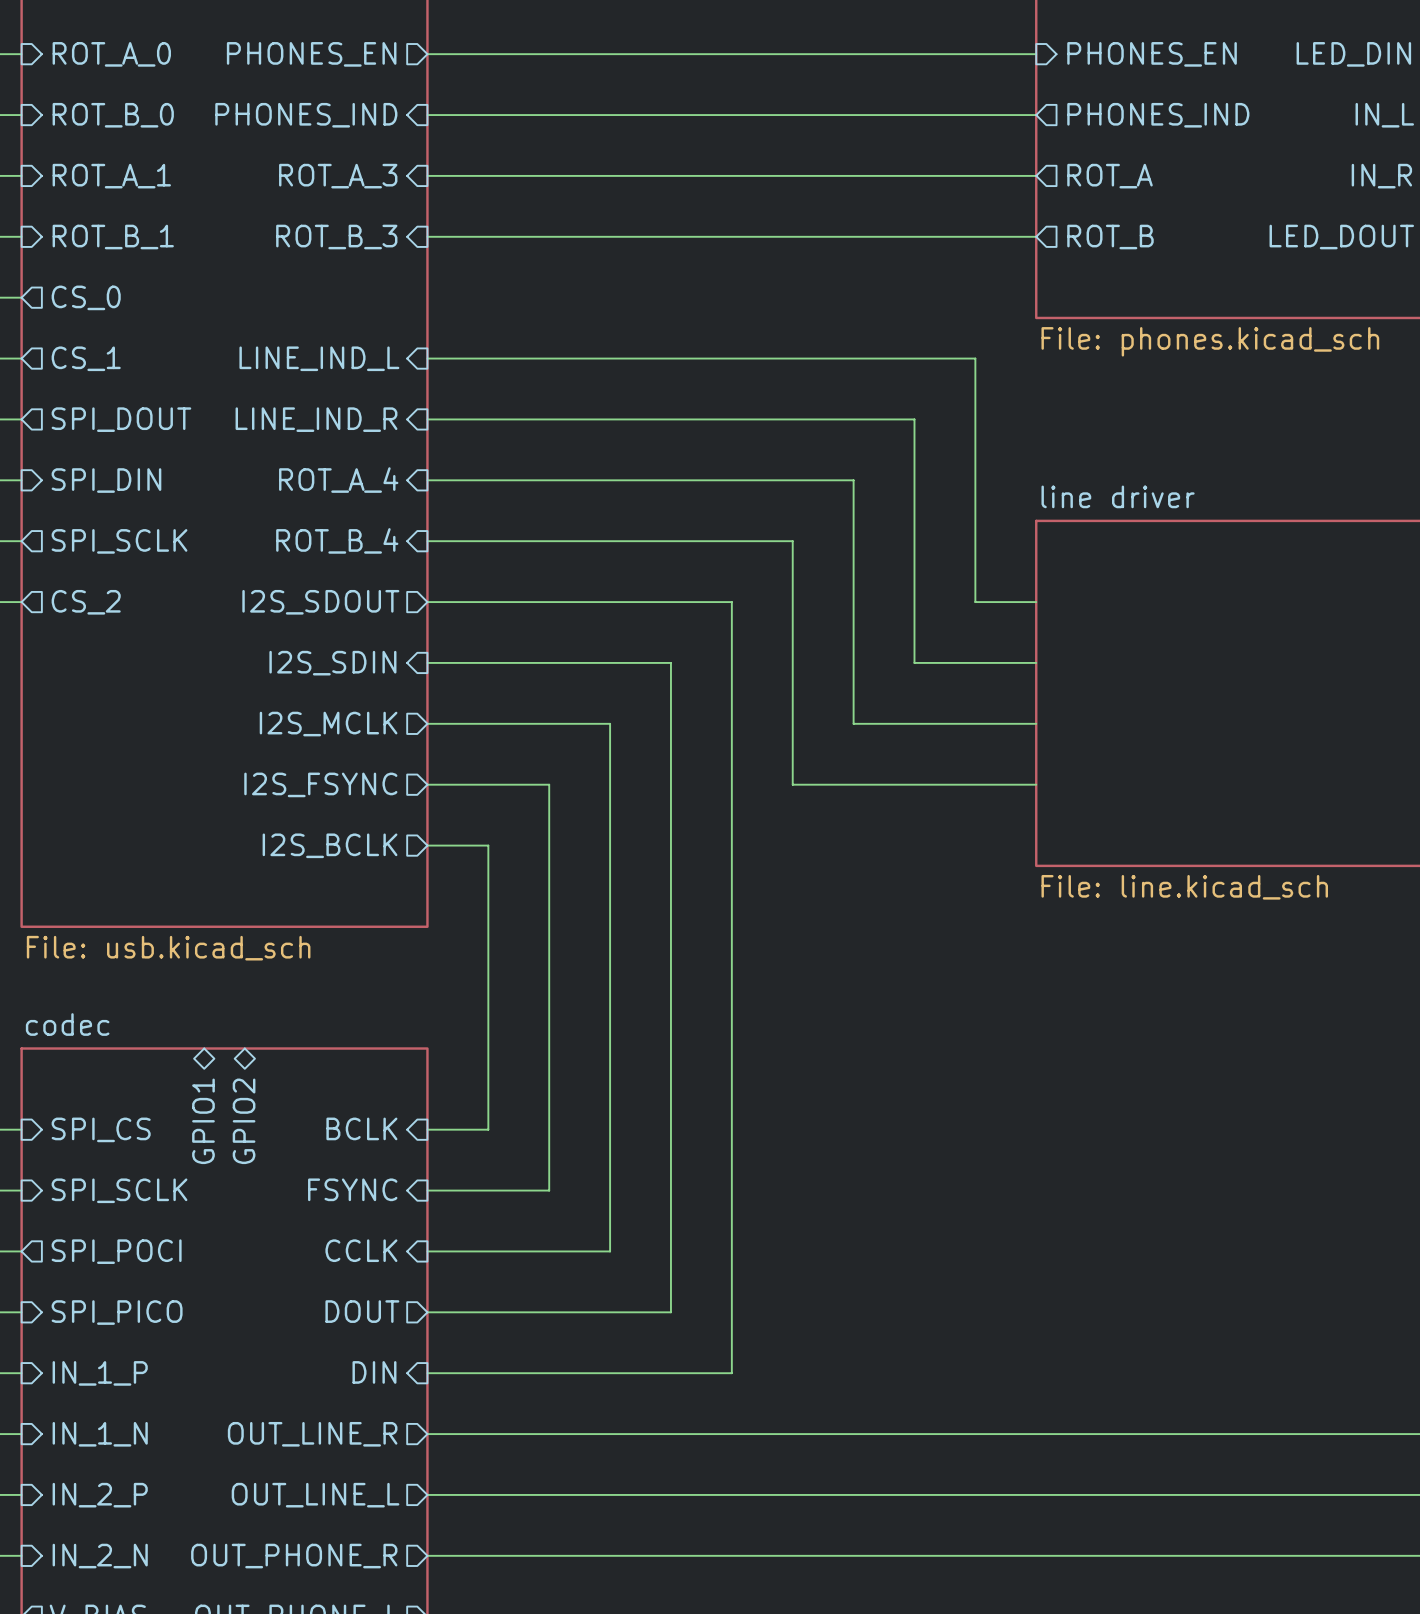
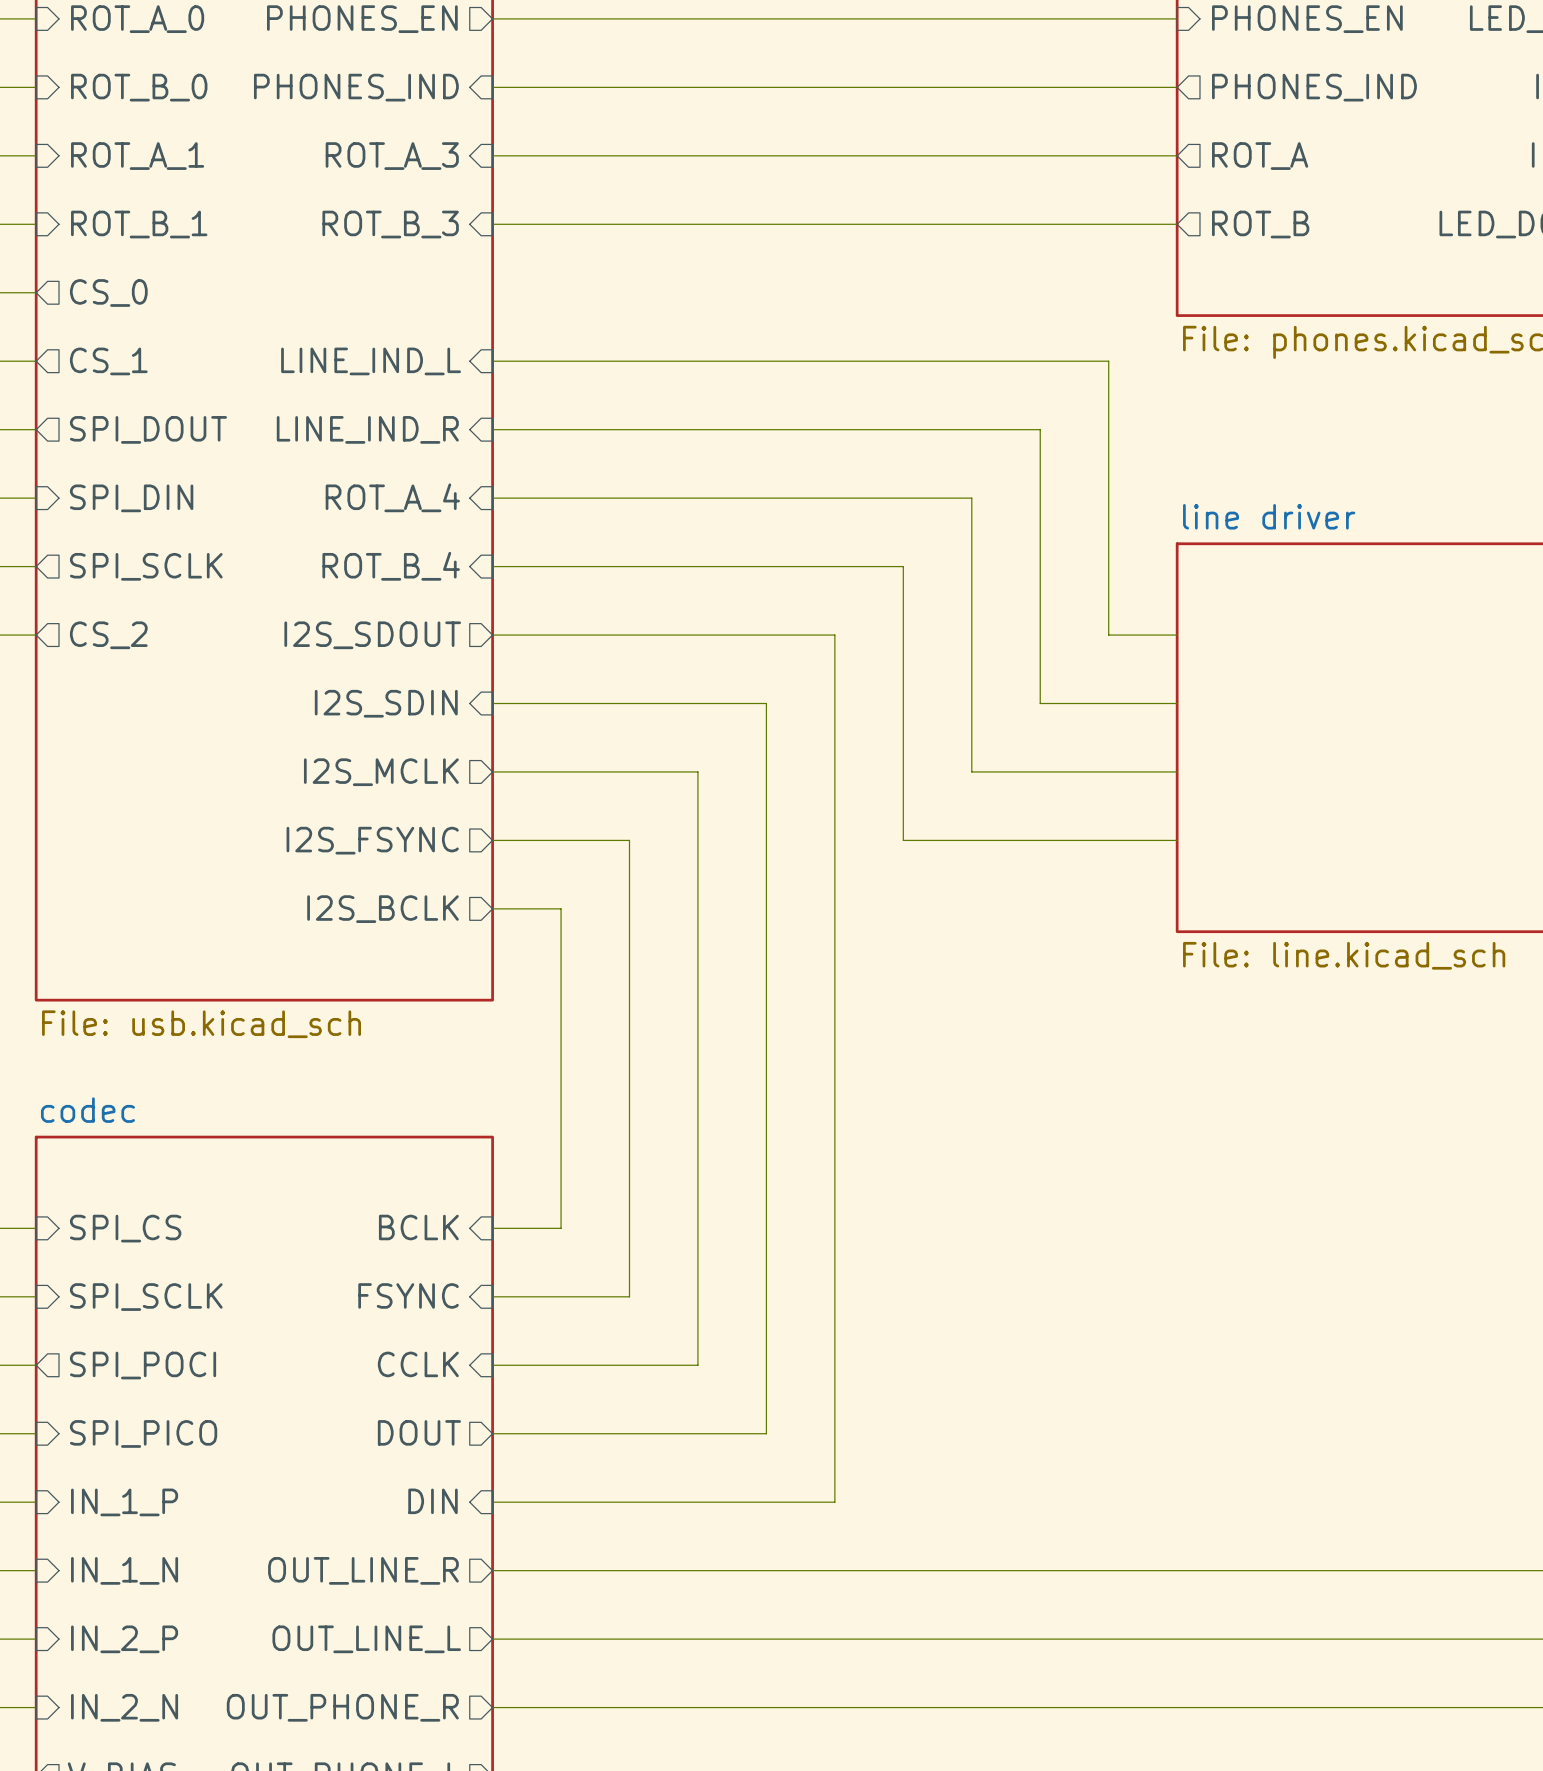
sheet pin: GPIO1 (203, 1121) -> none
sheet pin: GPIO2 (244, 1121) -> none

